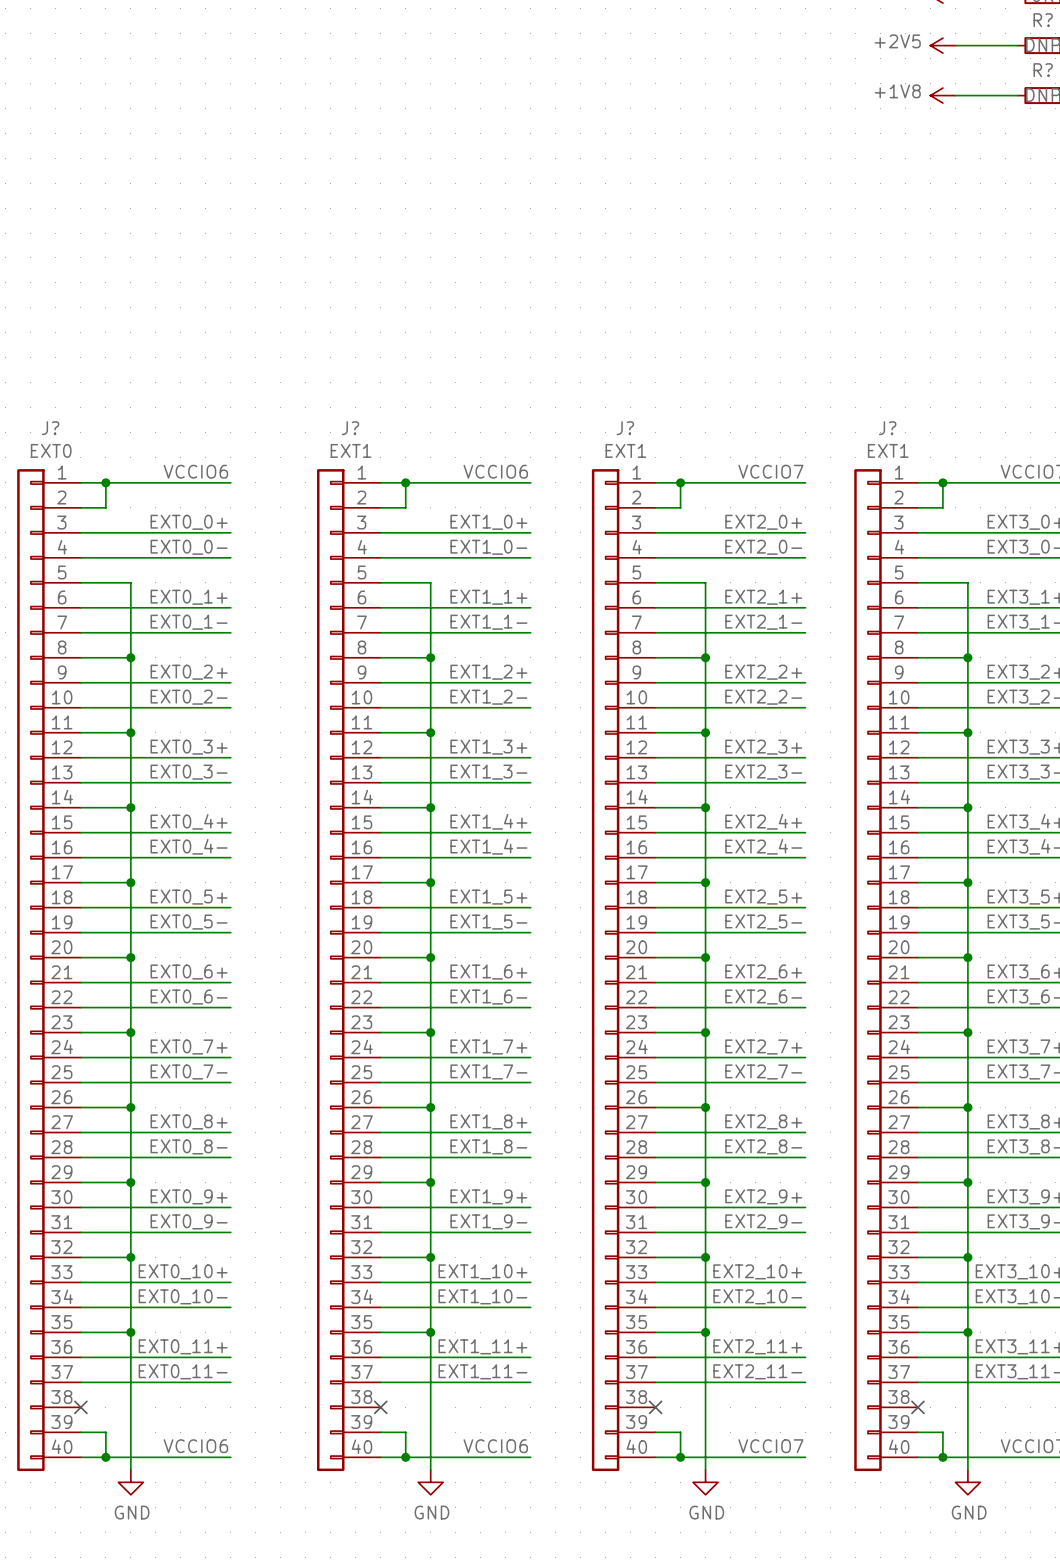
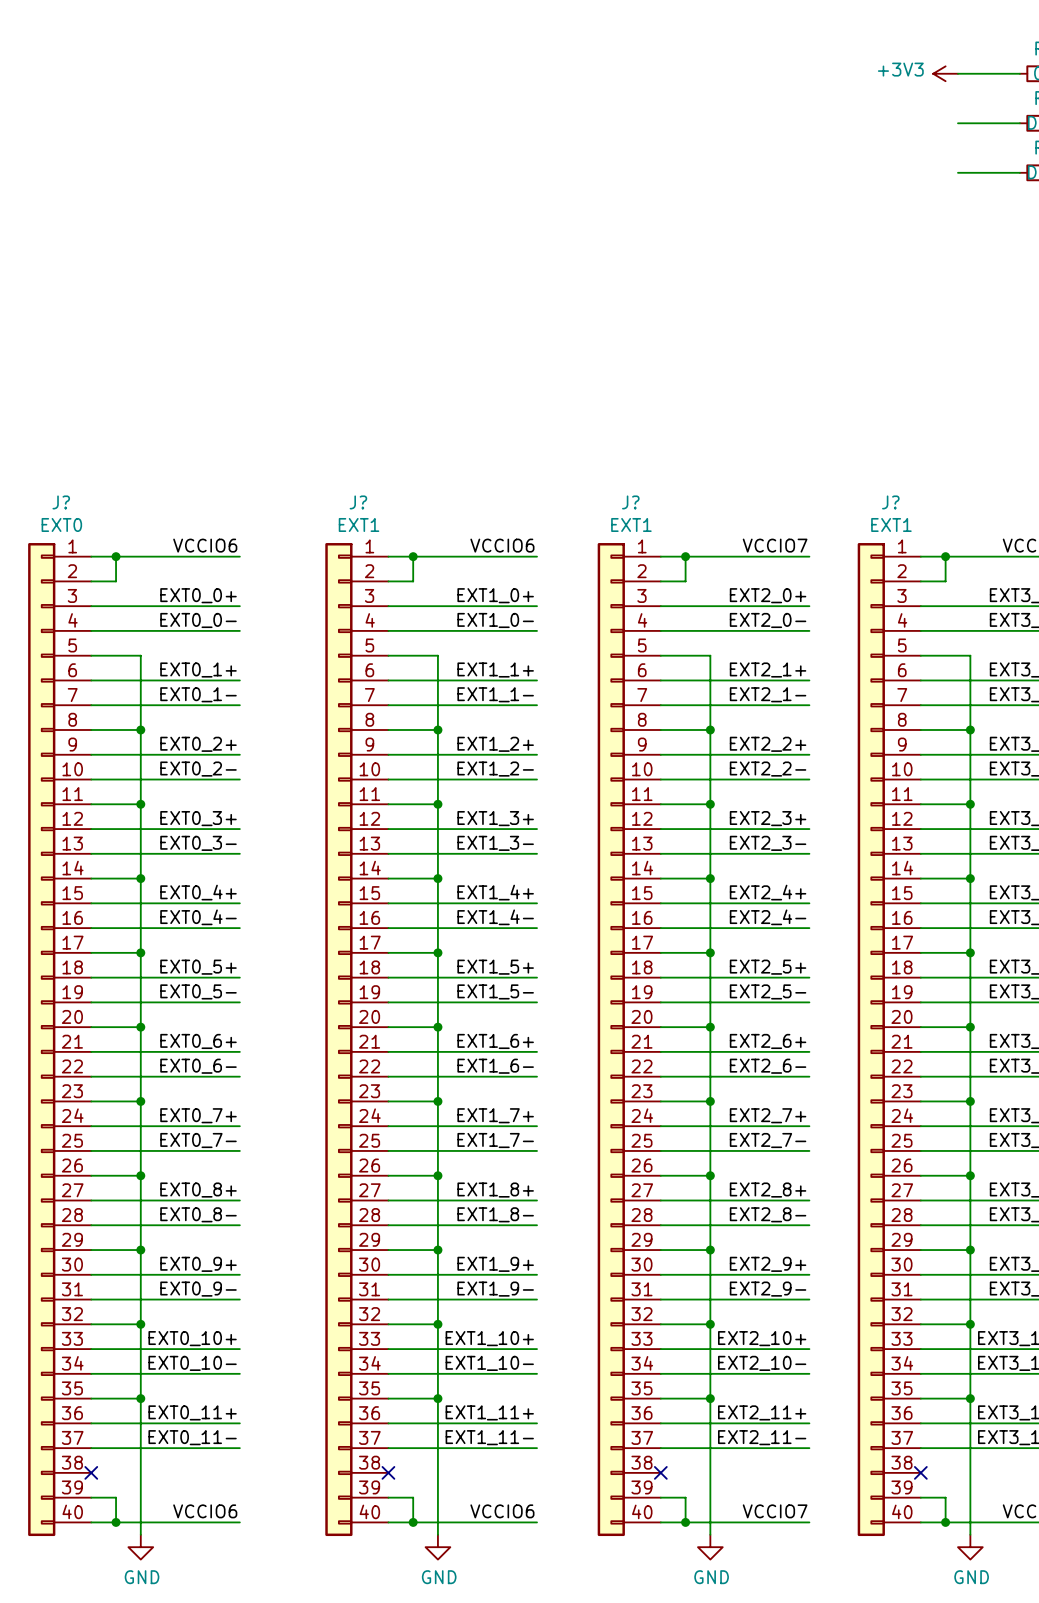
power symbol: +2V5 (942, 45) -> none
power symbol: +1V8 (942, 95) -> none

